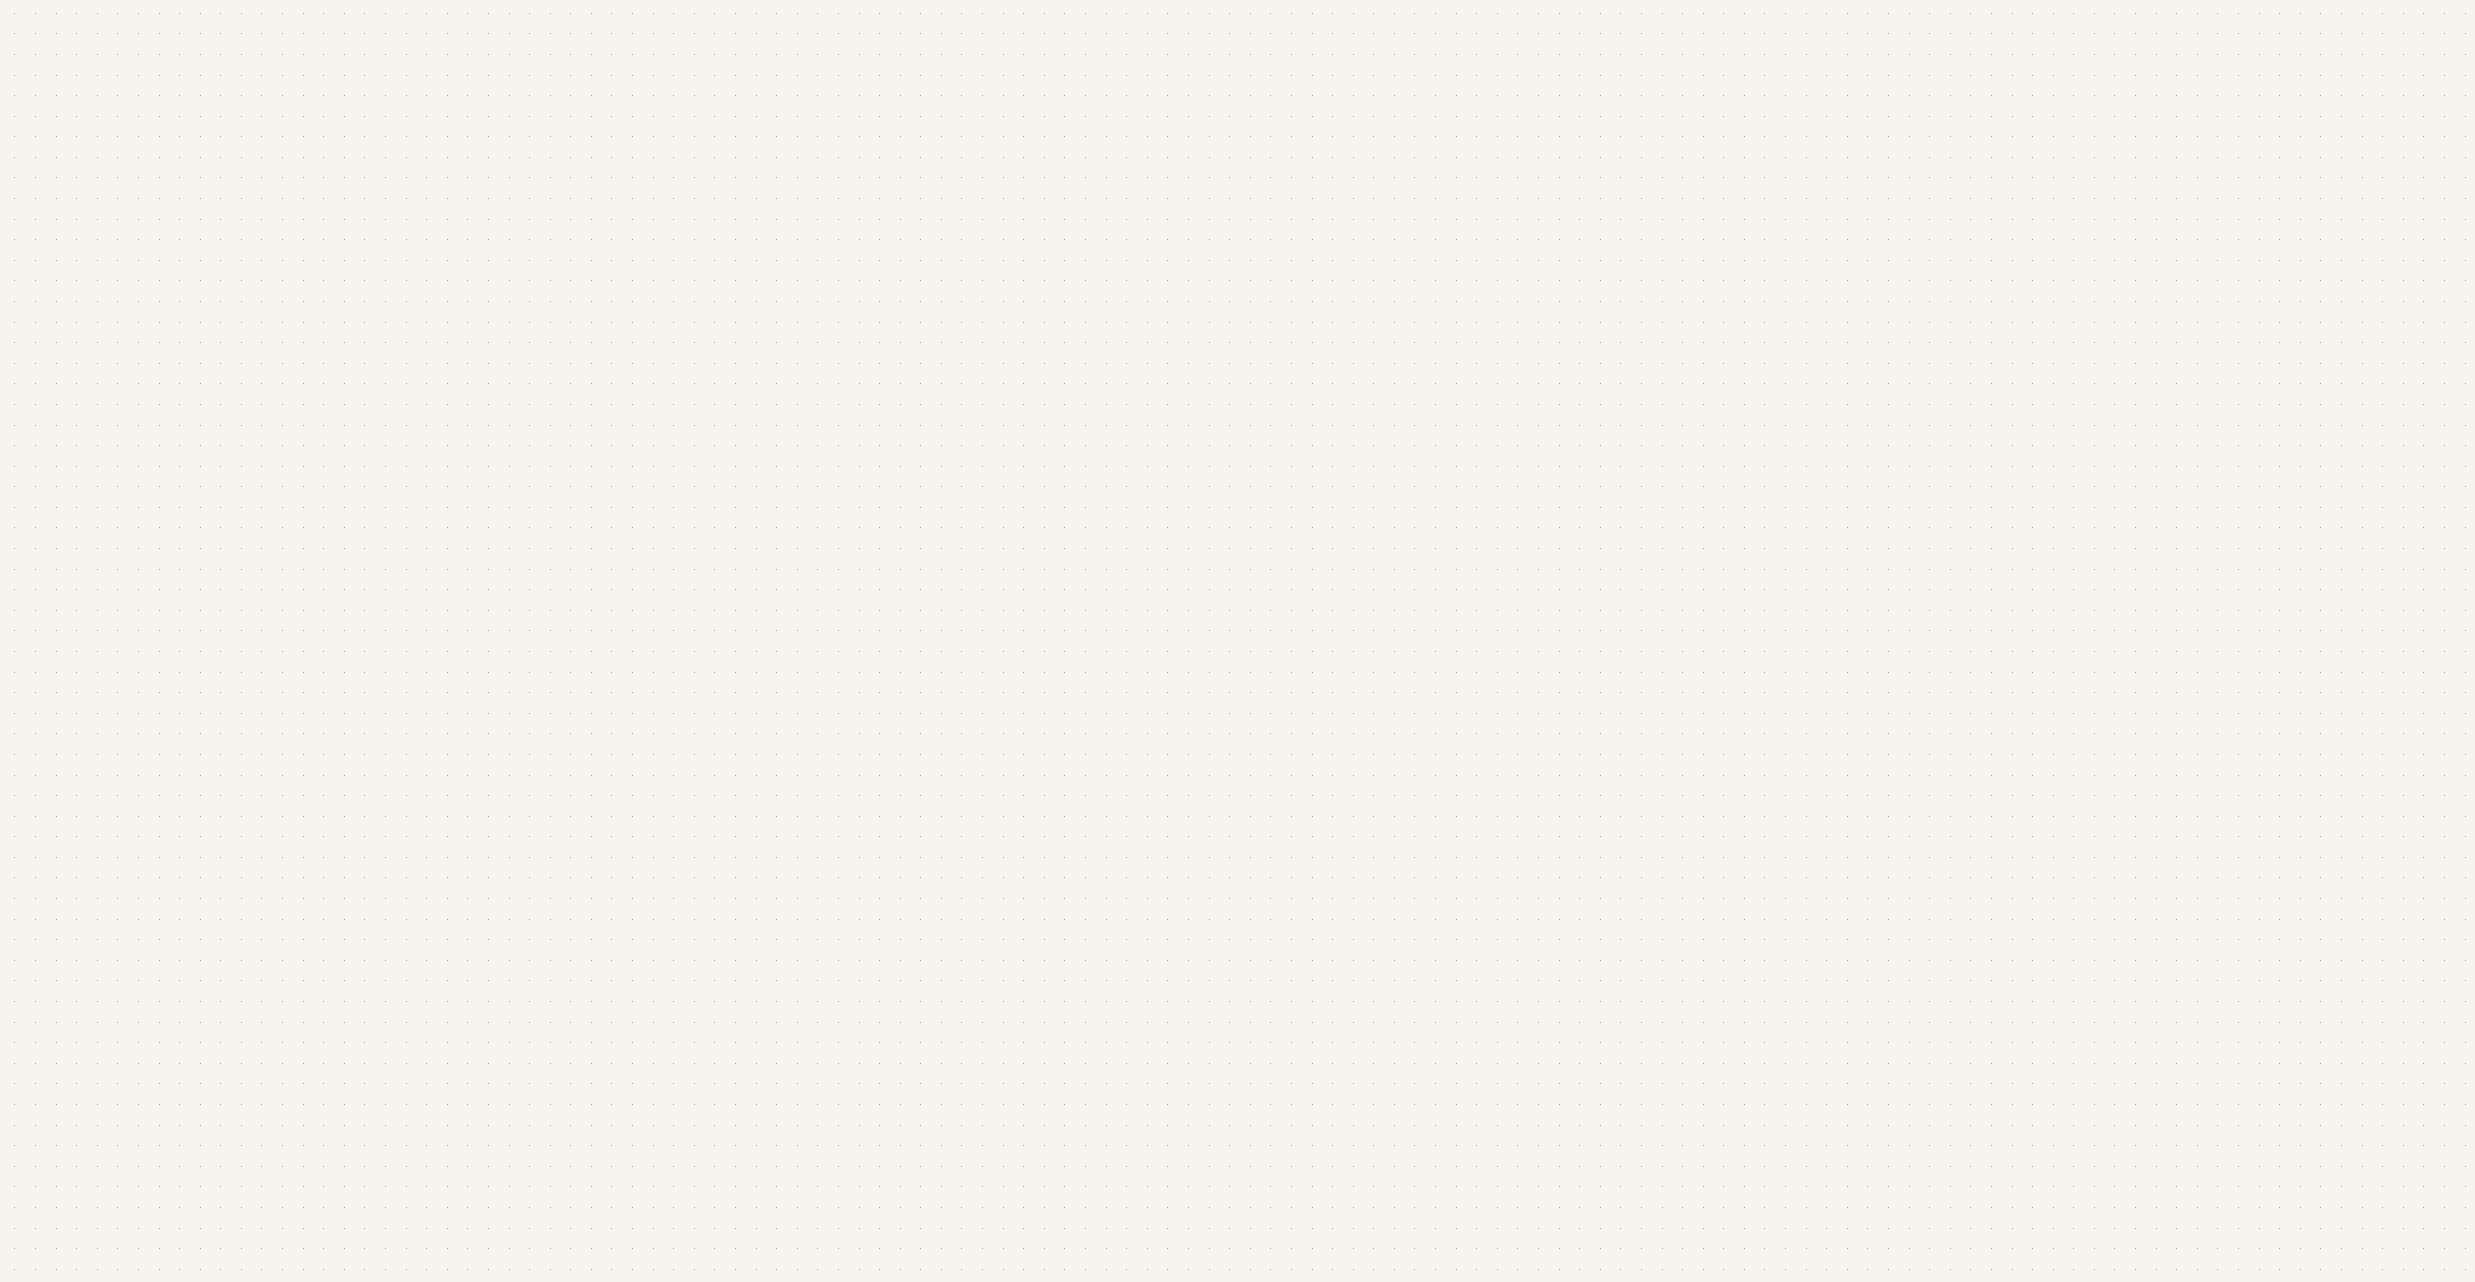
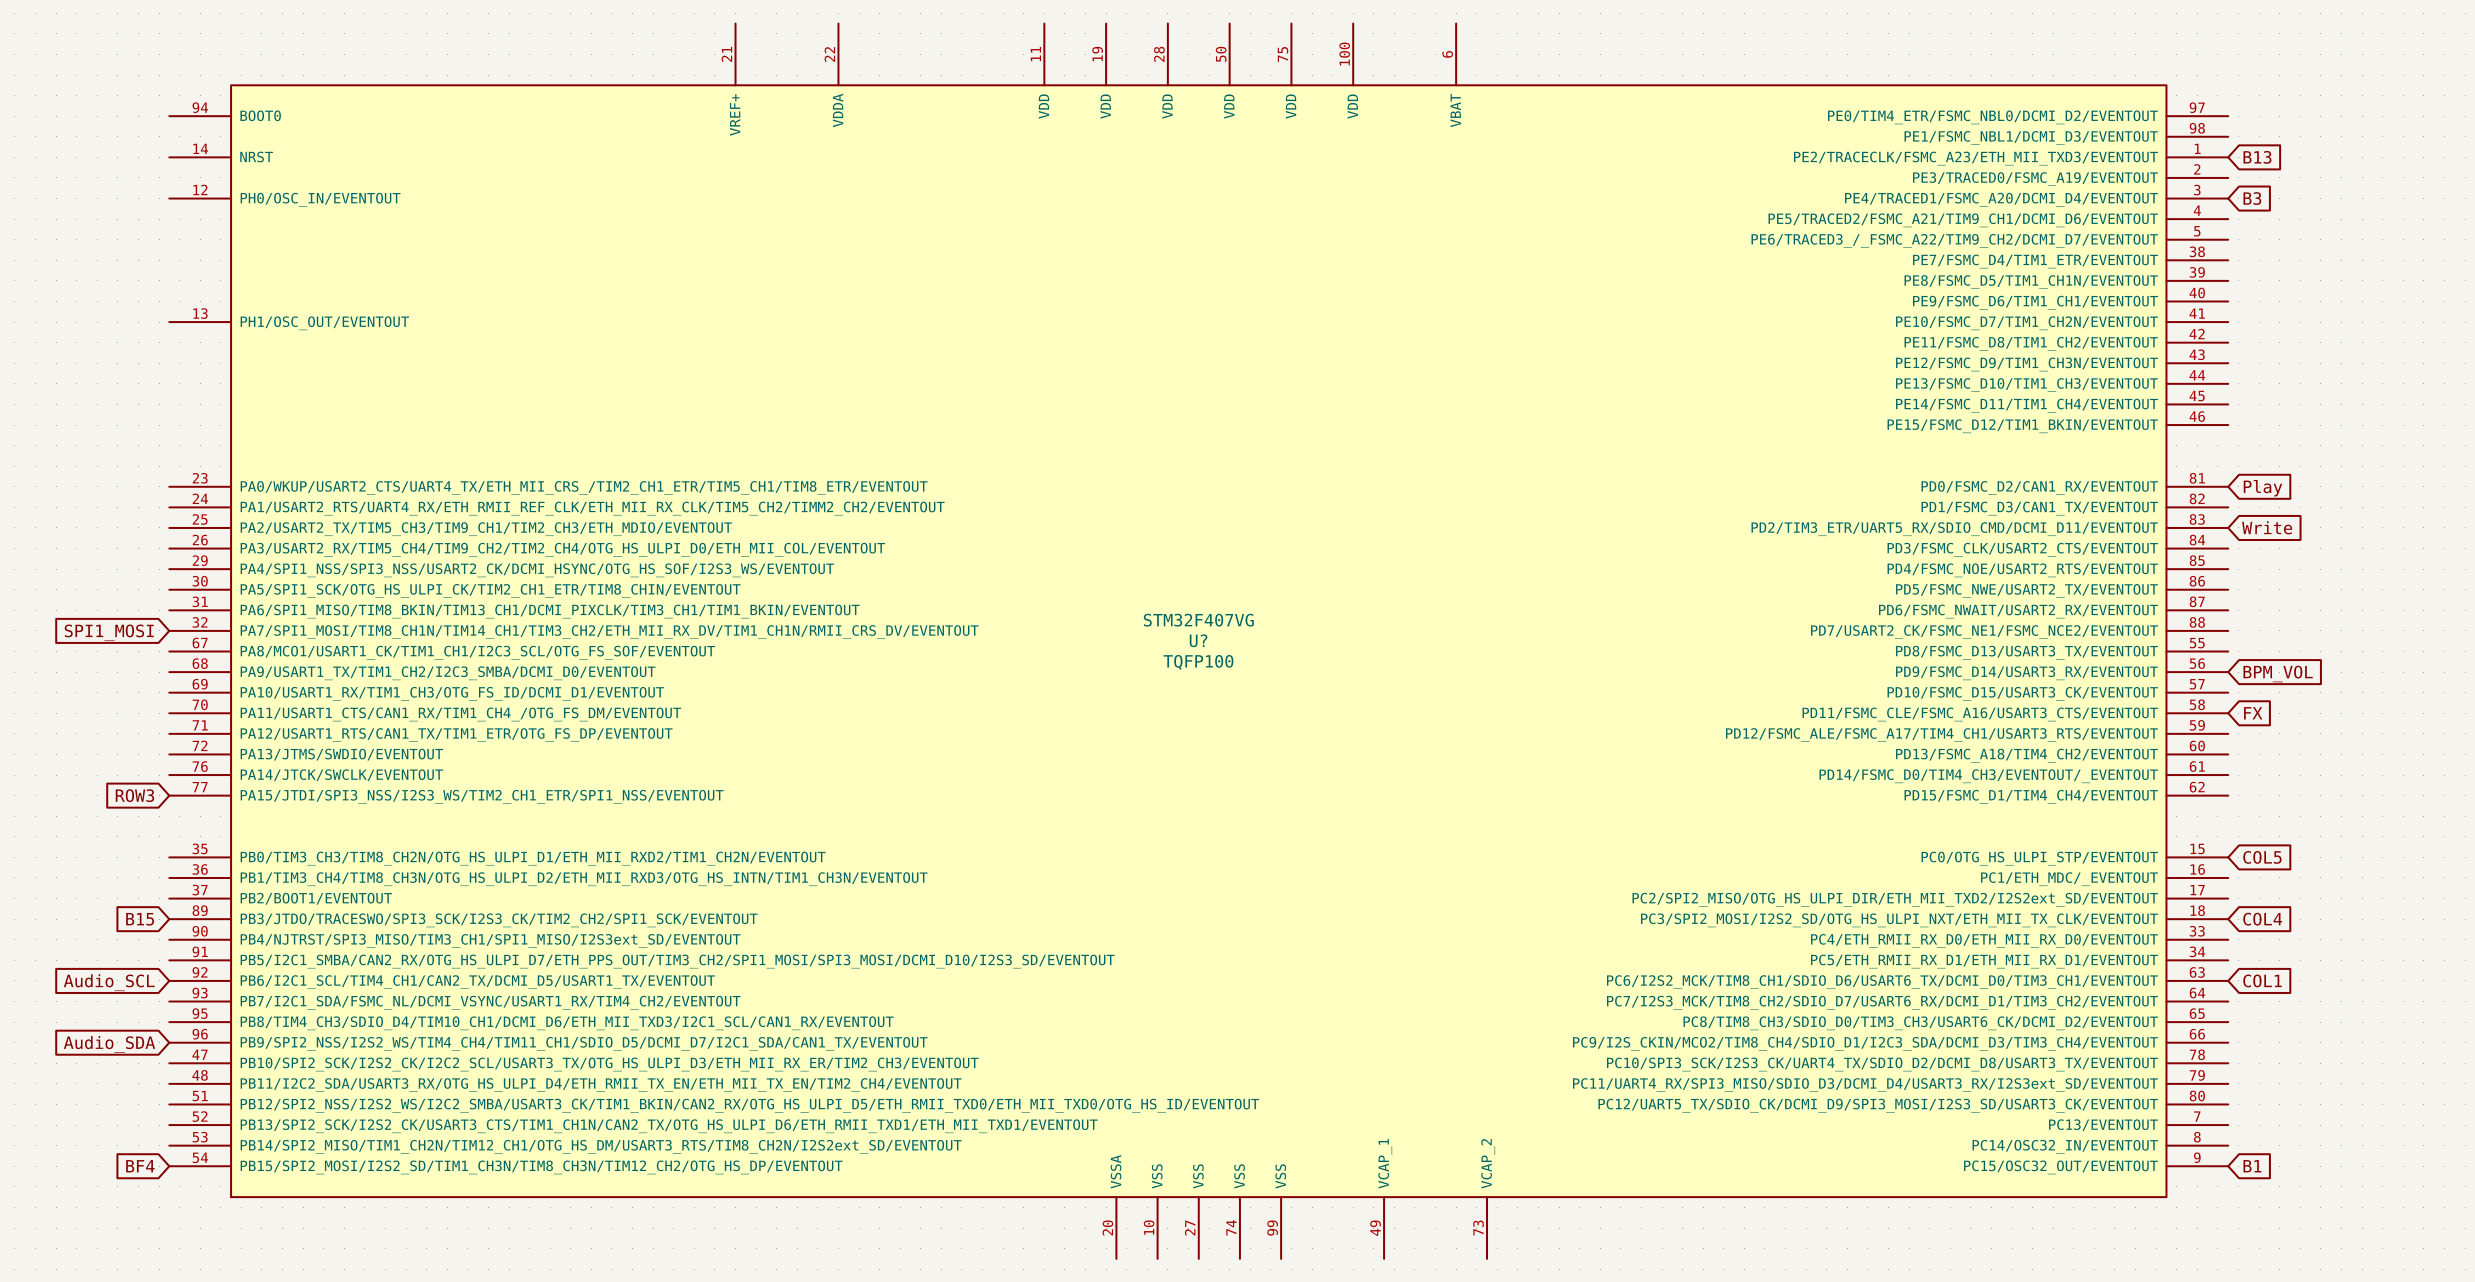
global label: none -> B13 (2257, 157)
global label: none -> B3 (2252, 198)
global label: none -> Play (2263, 488)
global label: none -> Write (2267, 527)
global label: none -> SPI1_MOSI (109, 632)
U?: none -> STM32F407VG (1198, 641)
global label: none -> BPM_VOL (2278, 673)
global label: none -> FX (2253, 713)
global label: none -> ROW3 (134, 795)
global label: none -> COL5 (2262, 857)
global label: none -> B15 (140, 919)
global label: none -> COL4 (2262, 919)
global label: none -> COL1 (2262, 980)
global label: none -> Audio_SCL (109, 982)
global label: none -> Audio_SDA (109, 1044)
global label: none -> BF4 (140, 1166)
global label: none -> B1 (2252, 1166)

